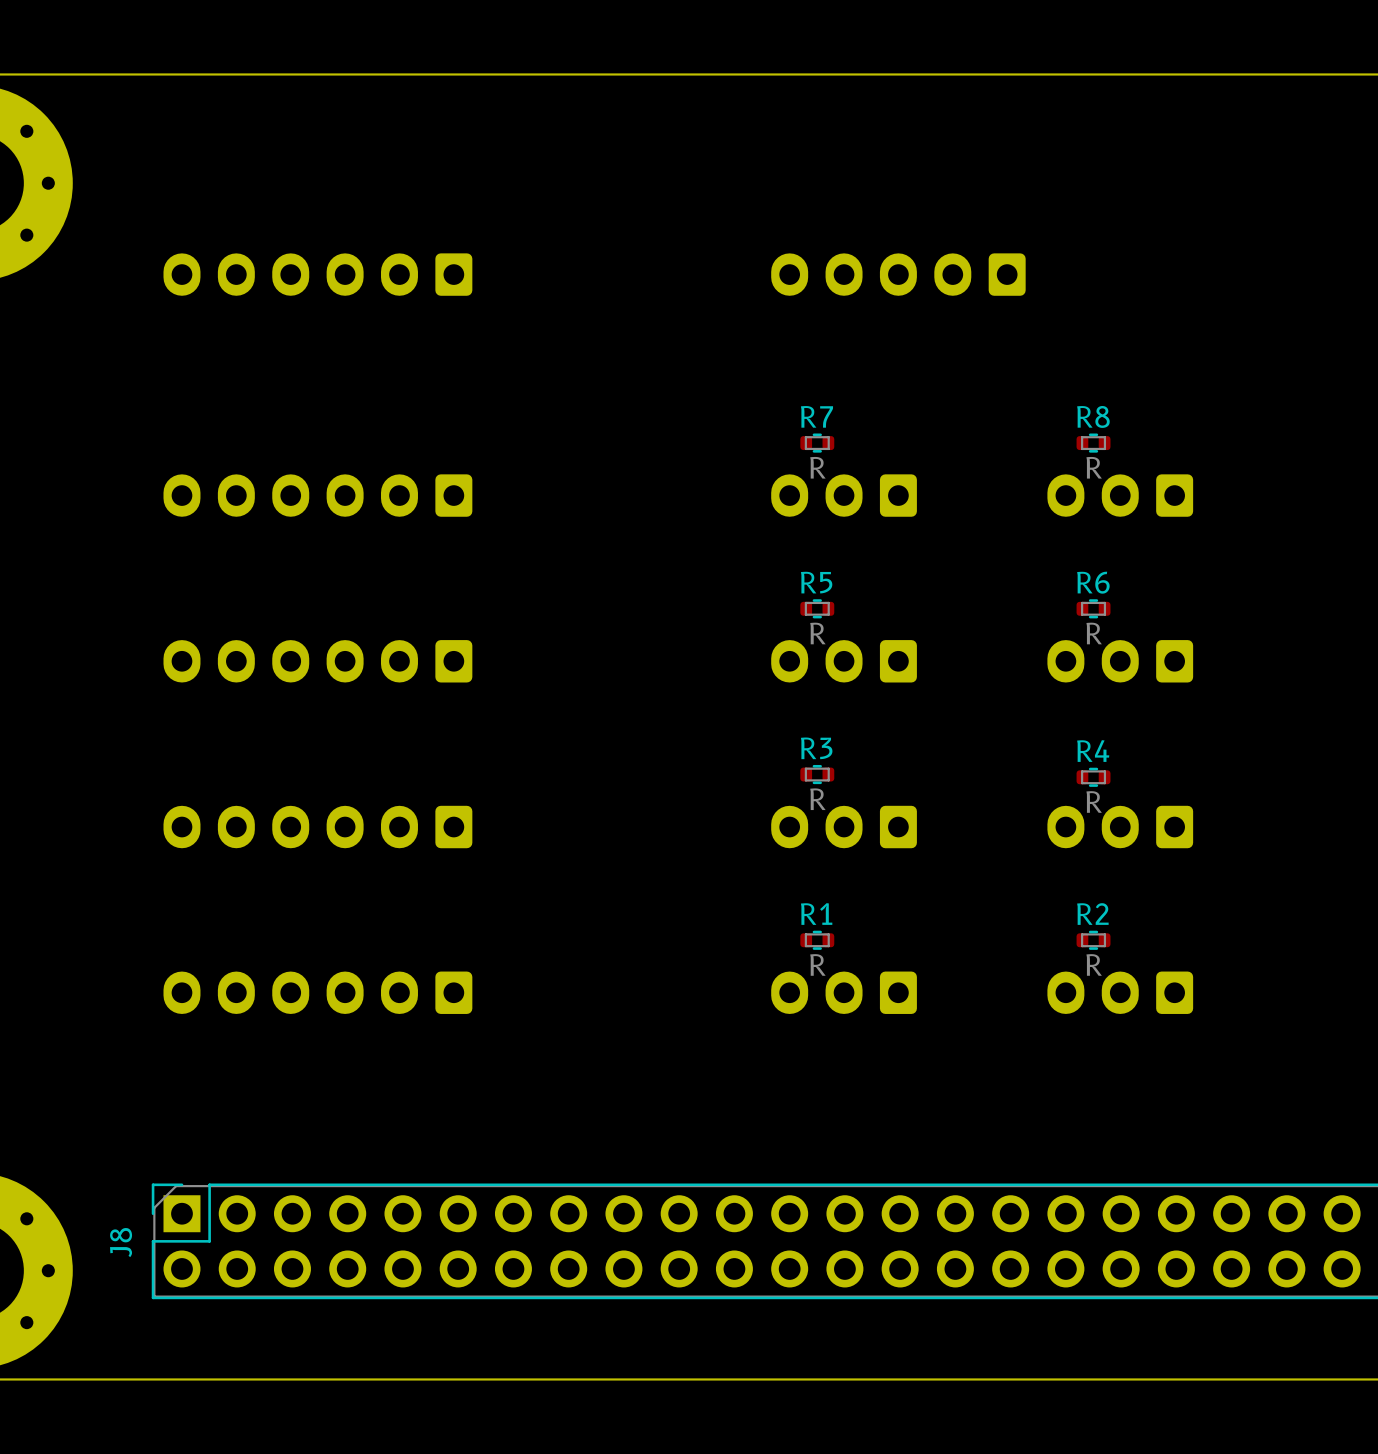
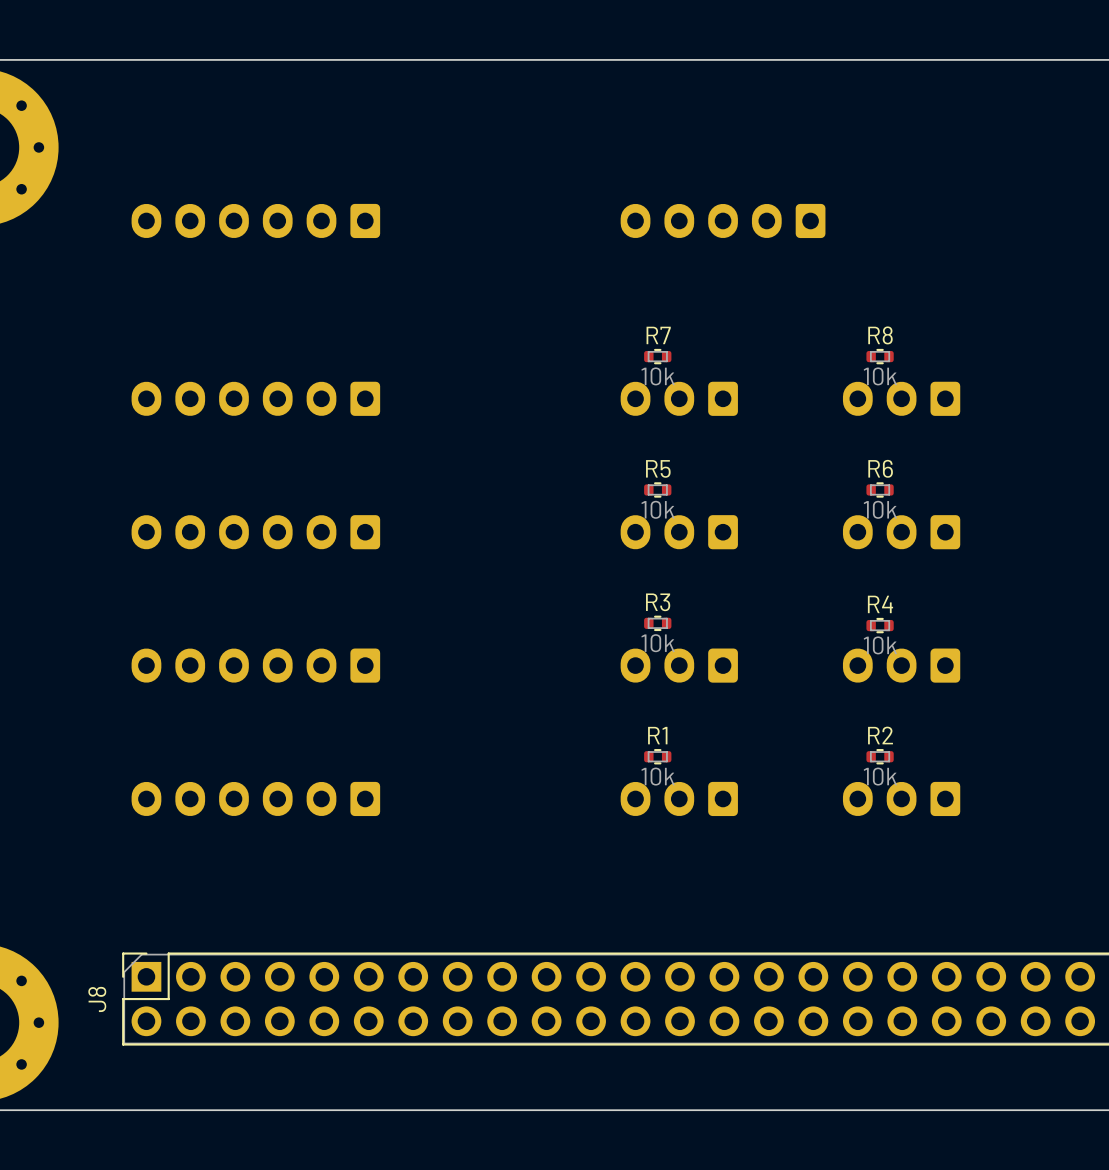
R7 value: R (817, 467) -> 10k (658, 376)
R8 value: R (1094, 467) -> 10k (880, 376)
R5 value: R (817, 633) -> 10k (658, 509)
R6 value: R (1094, 633) -> 10k (880, 509)
R3 value: R (817, 799) -> 10k (658, 643)
R4 value: R (1094, 801) -> 10k (880, 645)
R1 value: R (817, 964) -> 10k (658, 776)
R2 value: R (1094, 964) -> 10k (880, 776)

